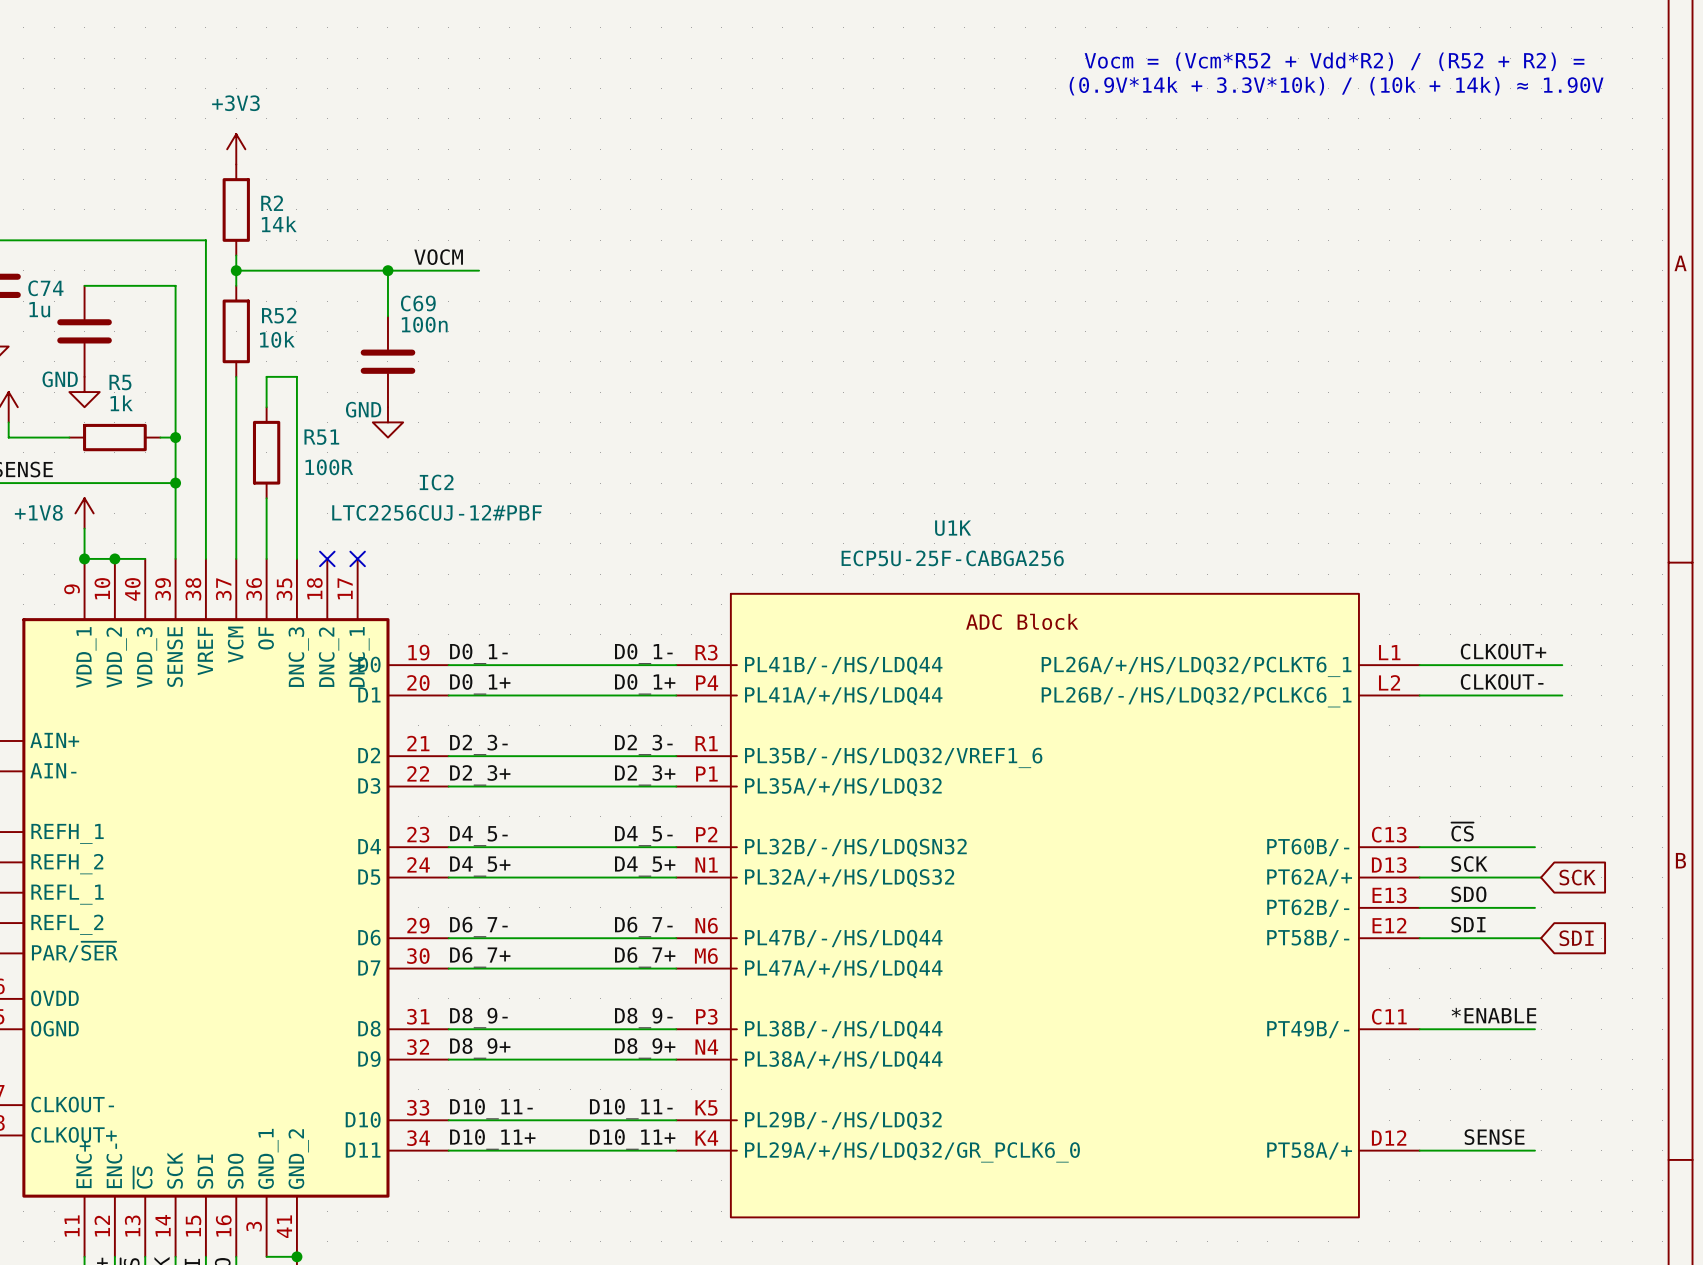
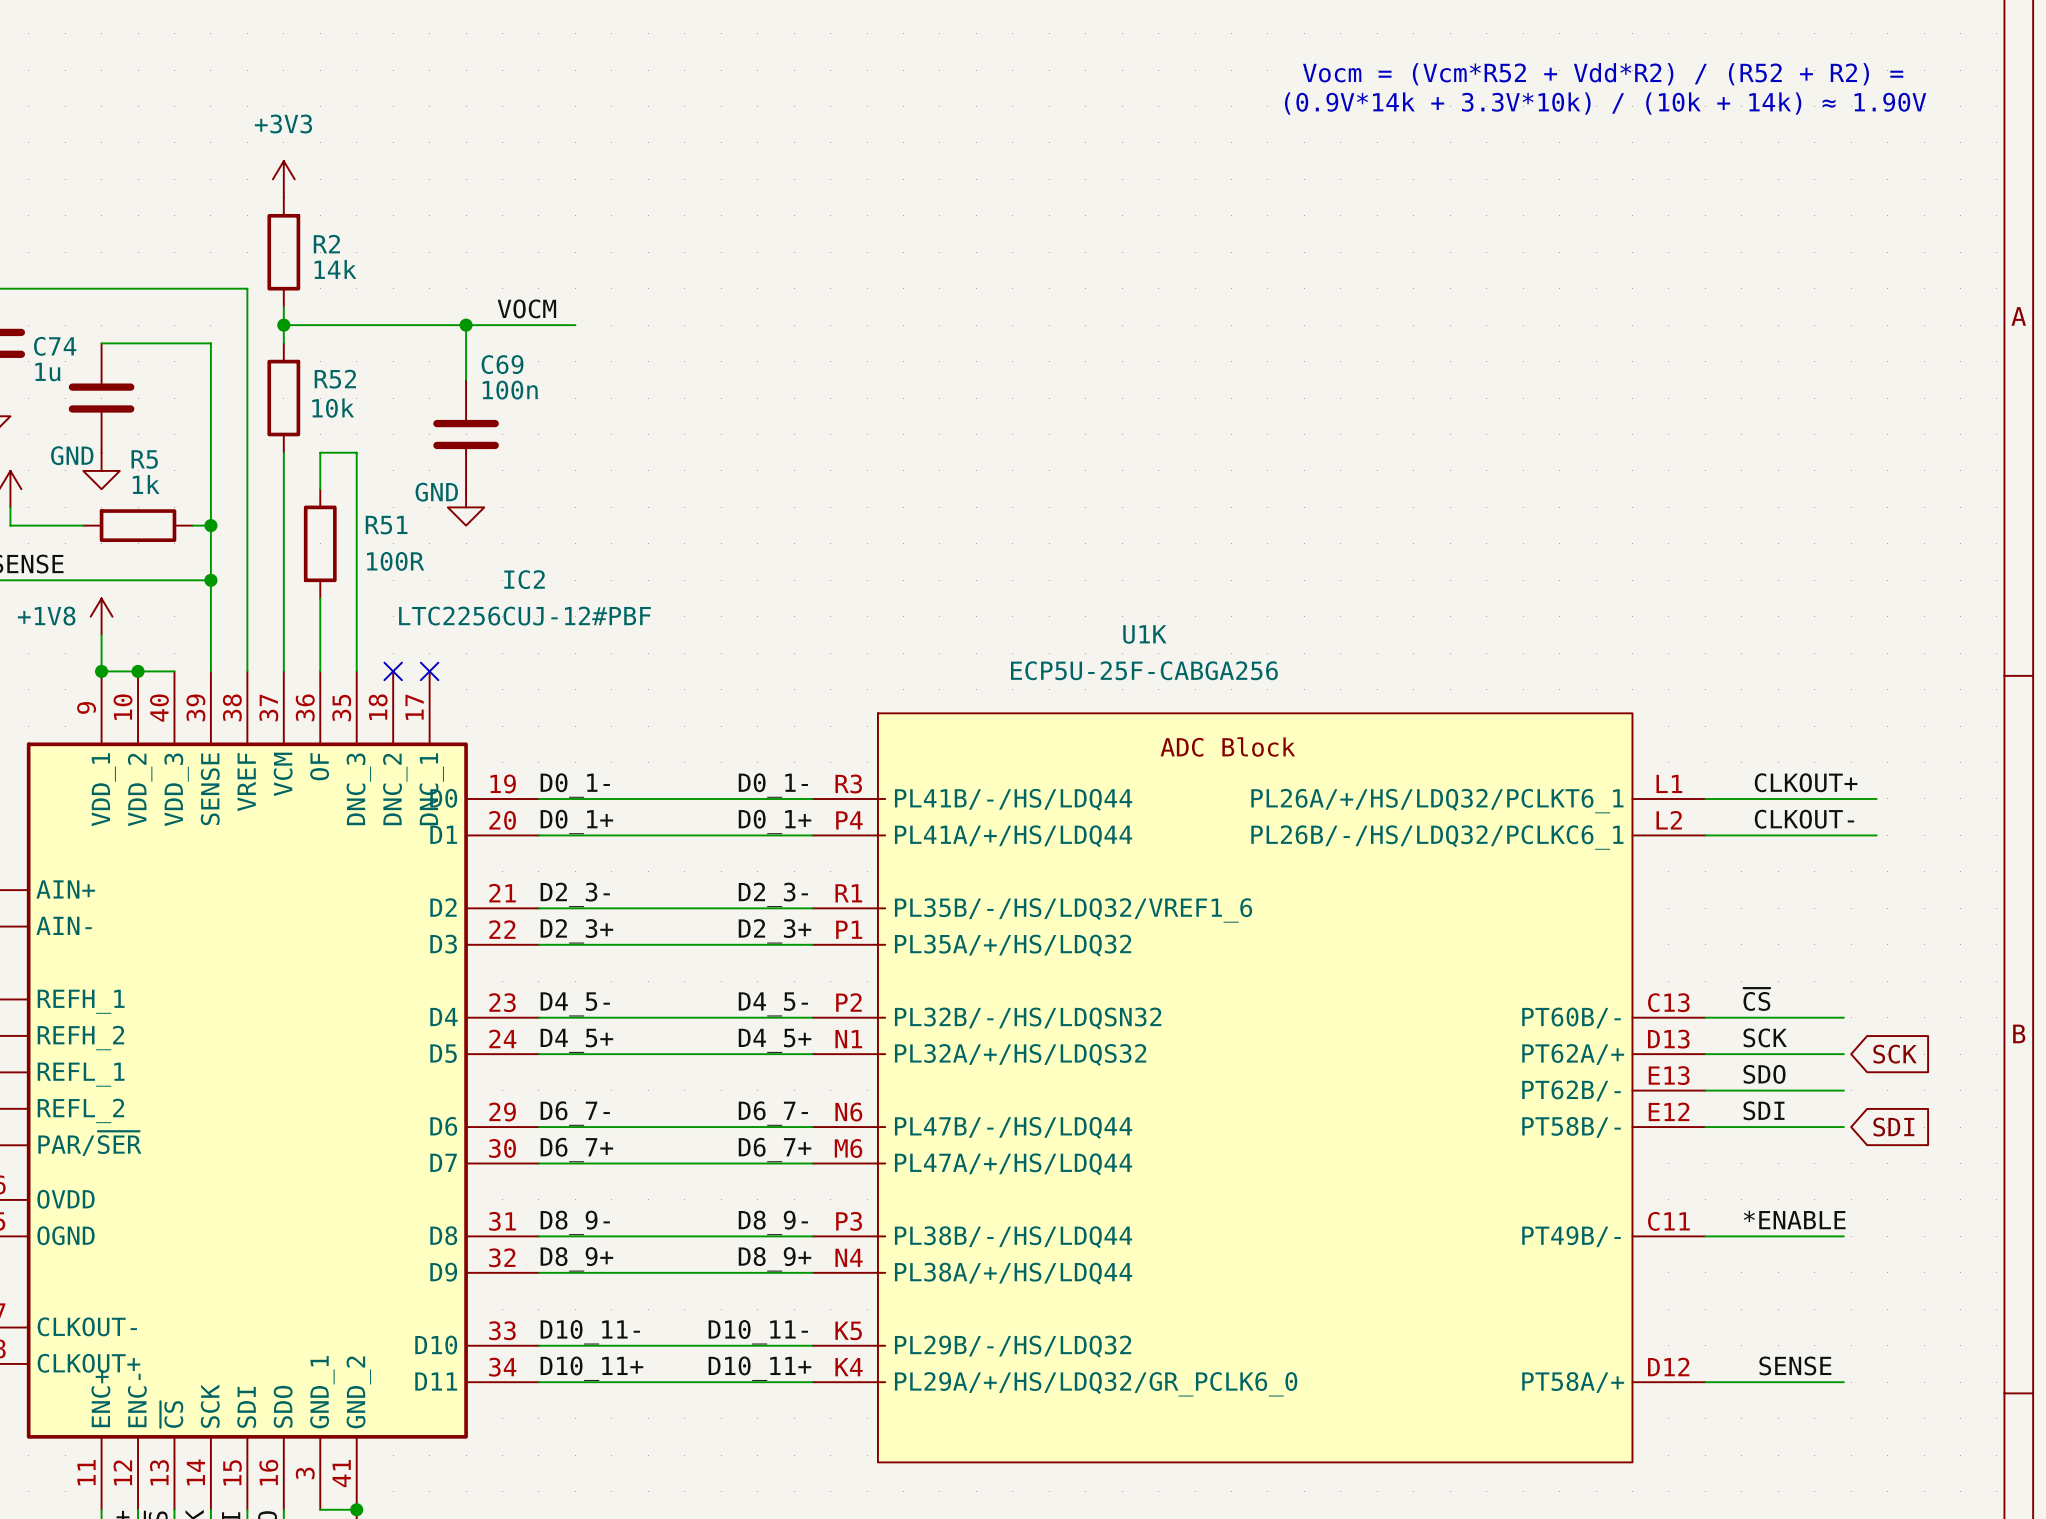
wire: (1534, 877) (1541, 877) -> none
wire: (1534, 938) (1541, 938) -> none

